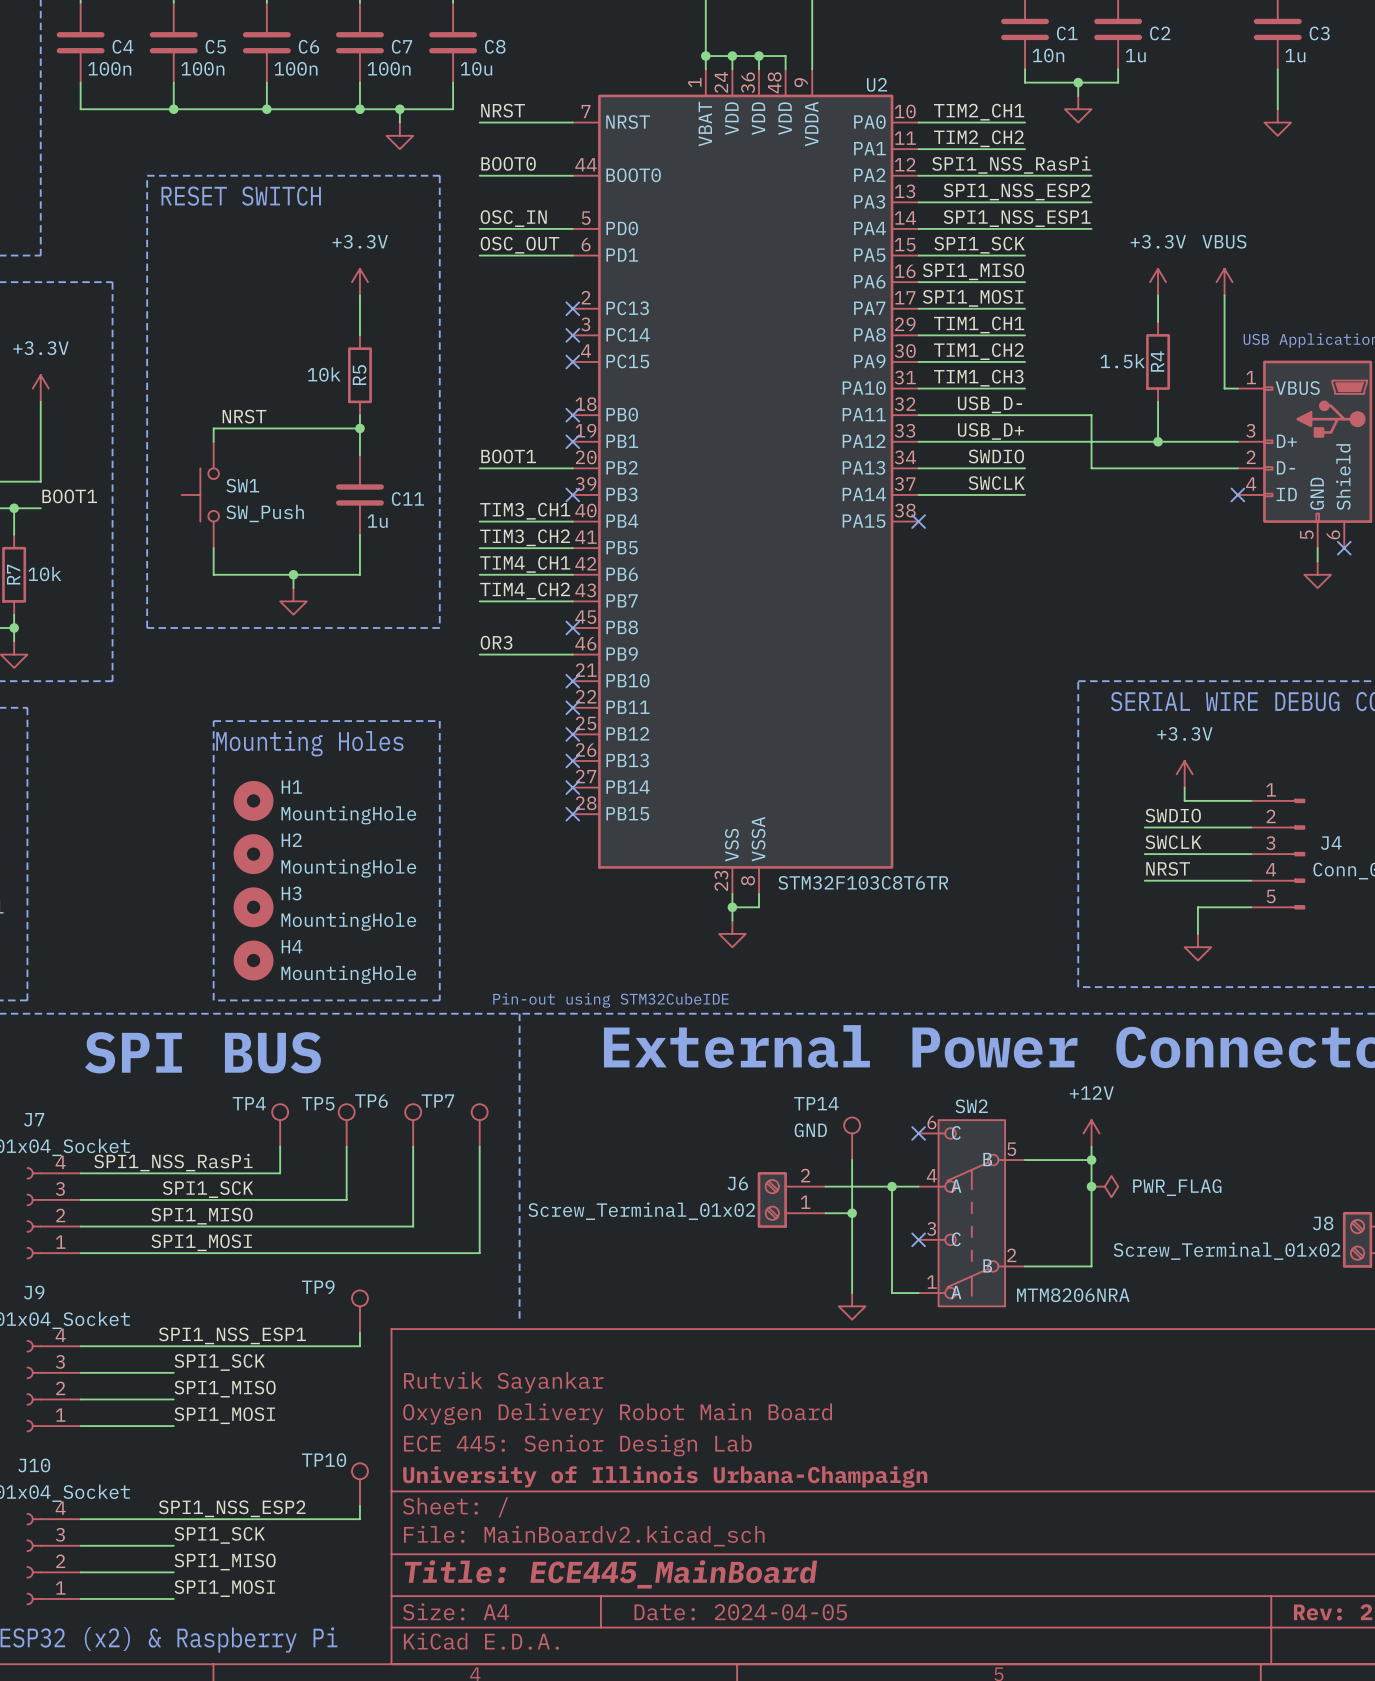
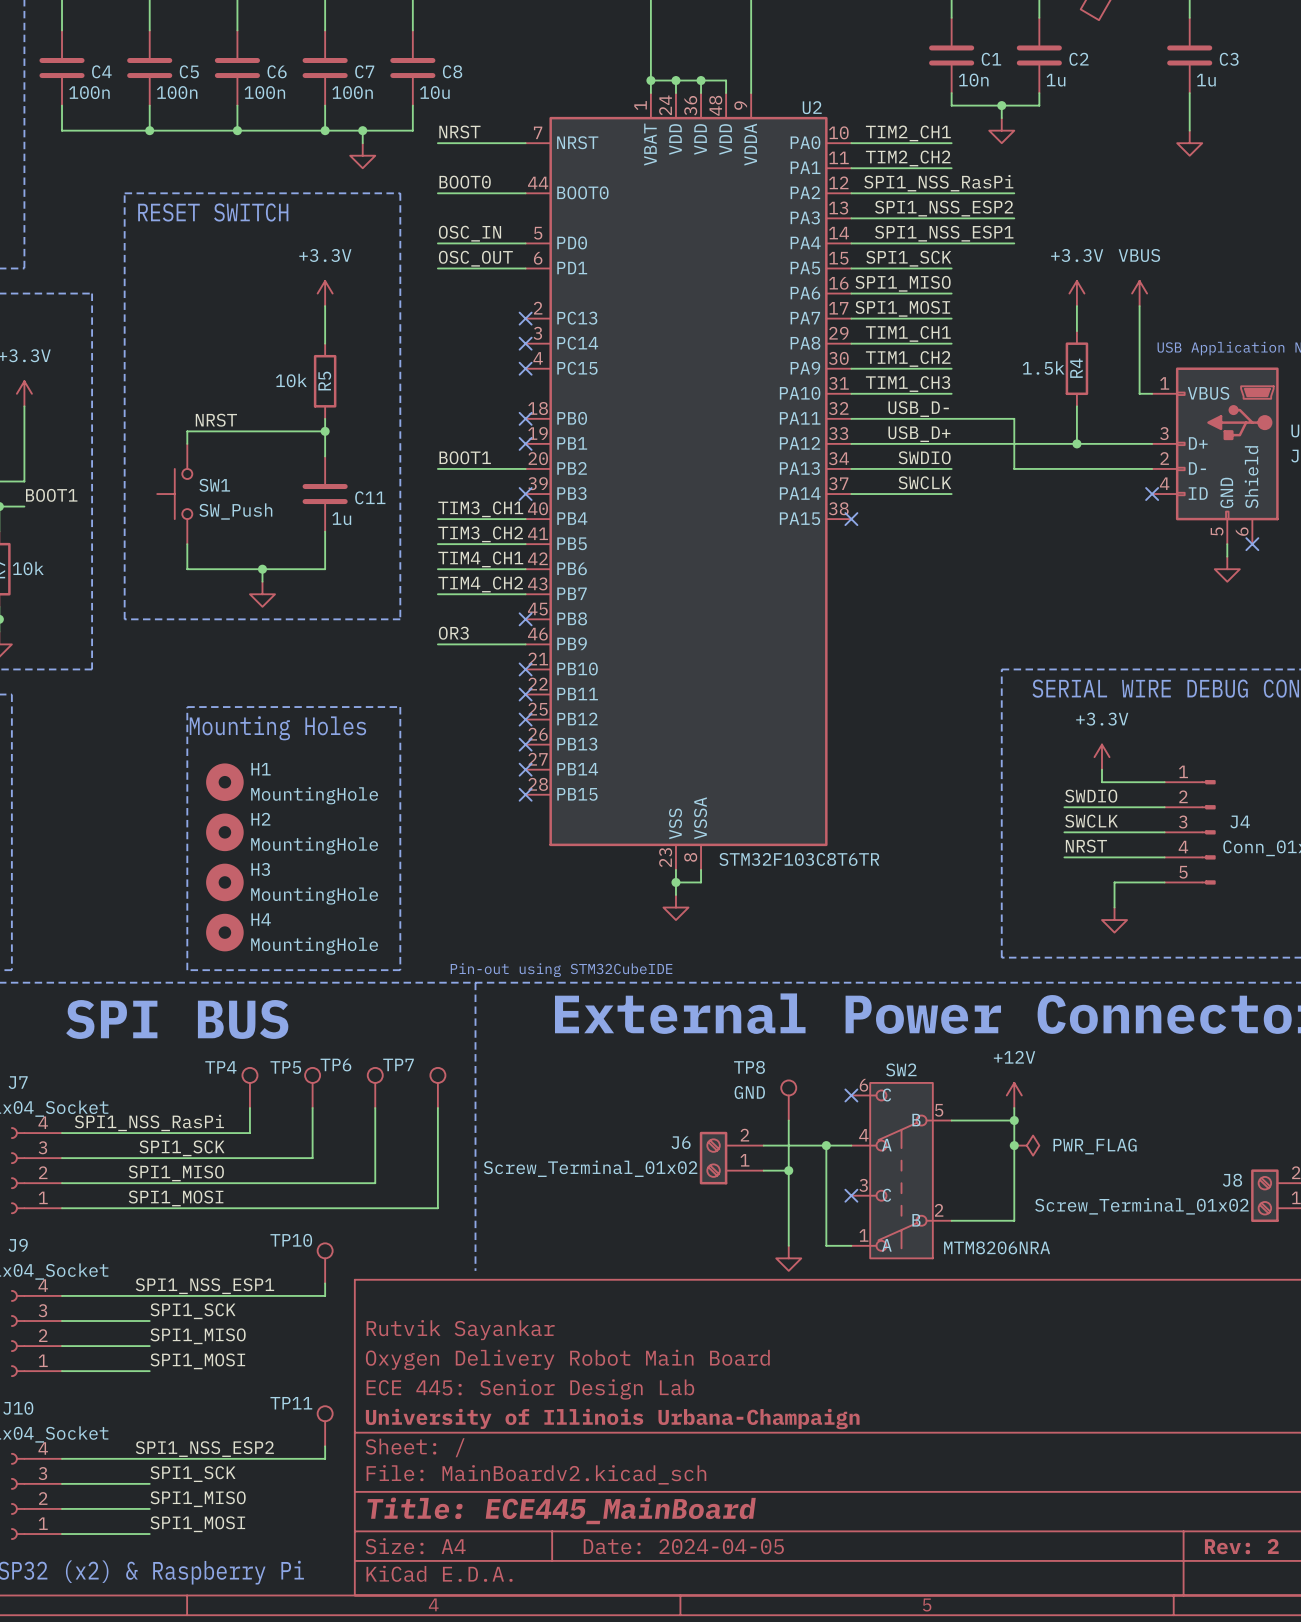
TP14 name: TP14 (816, 1103) -> TP8 (749, 1067)
TP9 name: TP9 (318, 1287) -> TP10 (291, 1240)
TP10 name: TP10 (324, 1460) -> TP11 (291, 1403)

